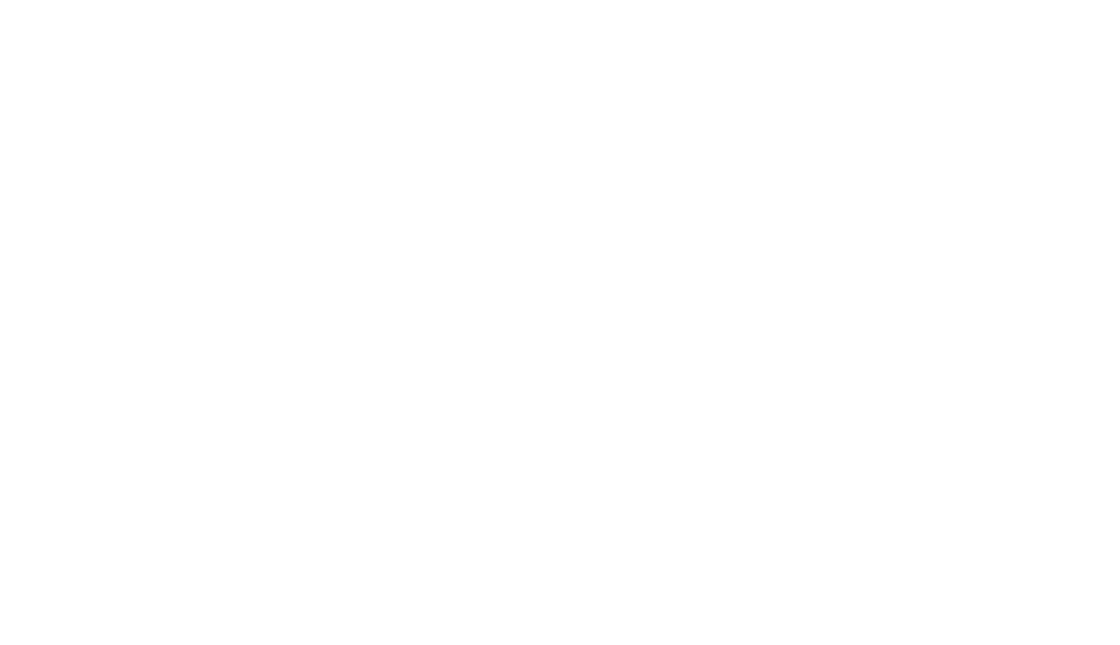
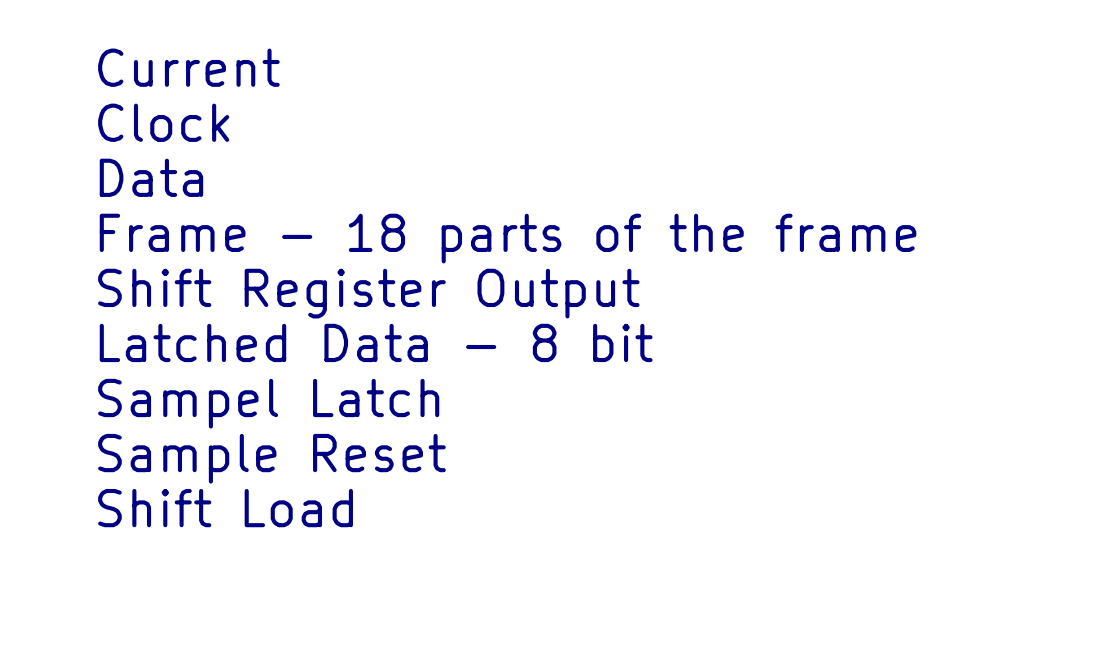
text: none -> Current (188, 67)
text: none -> Clock (163, 122)
text: none -> Data (151, 177)
text: none -> Frame - 18 parts of the frame (508, 238)
text: none -> Shift Register Output (368, 293)
text: none -> Latched Data - 8 bit (376, 342)
text: none -> Sampel Latch (268, 403)
text: none -> Sample Reset (271, 458)
text: none -> Shift Load (225, 508)

